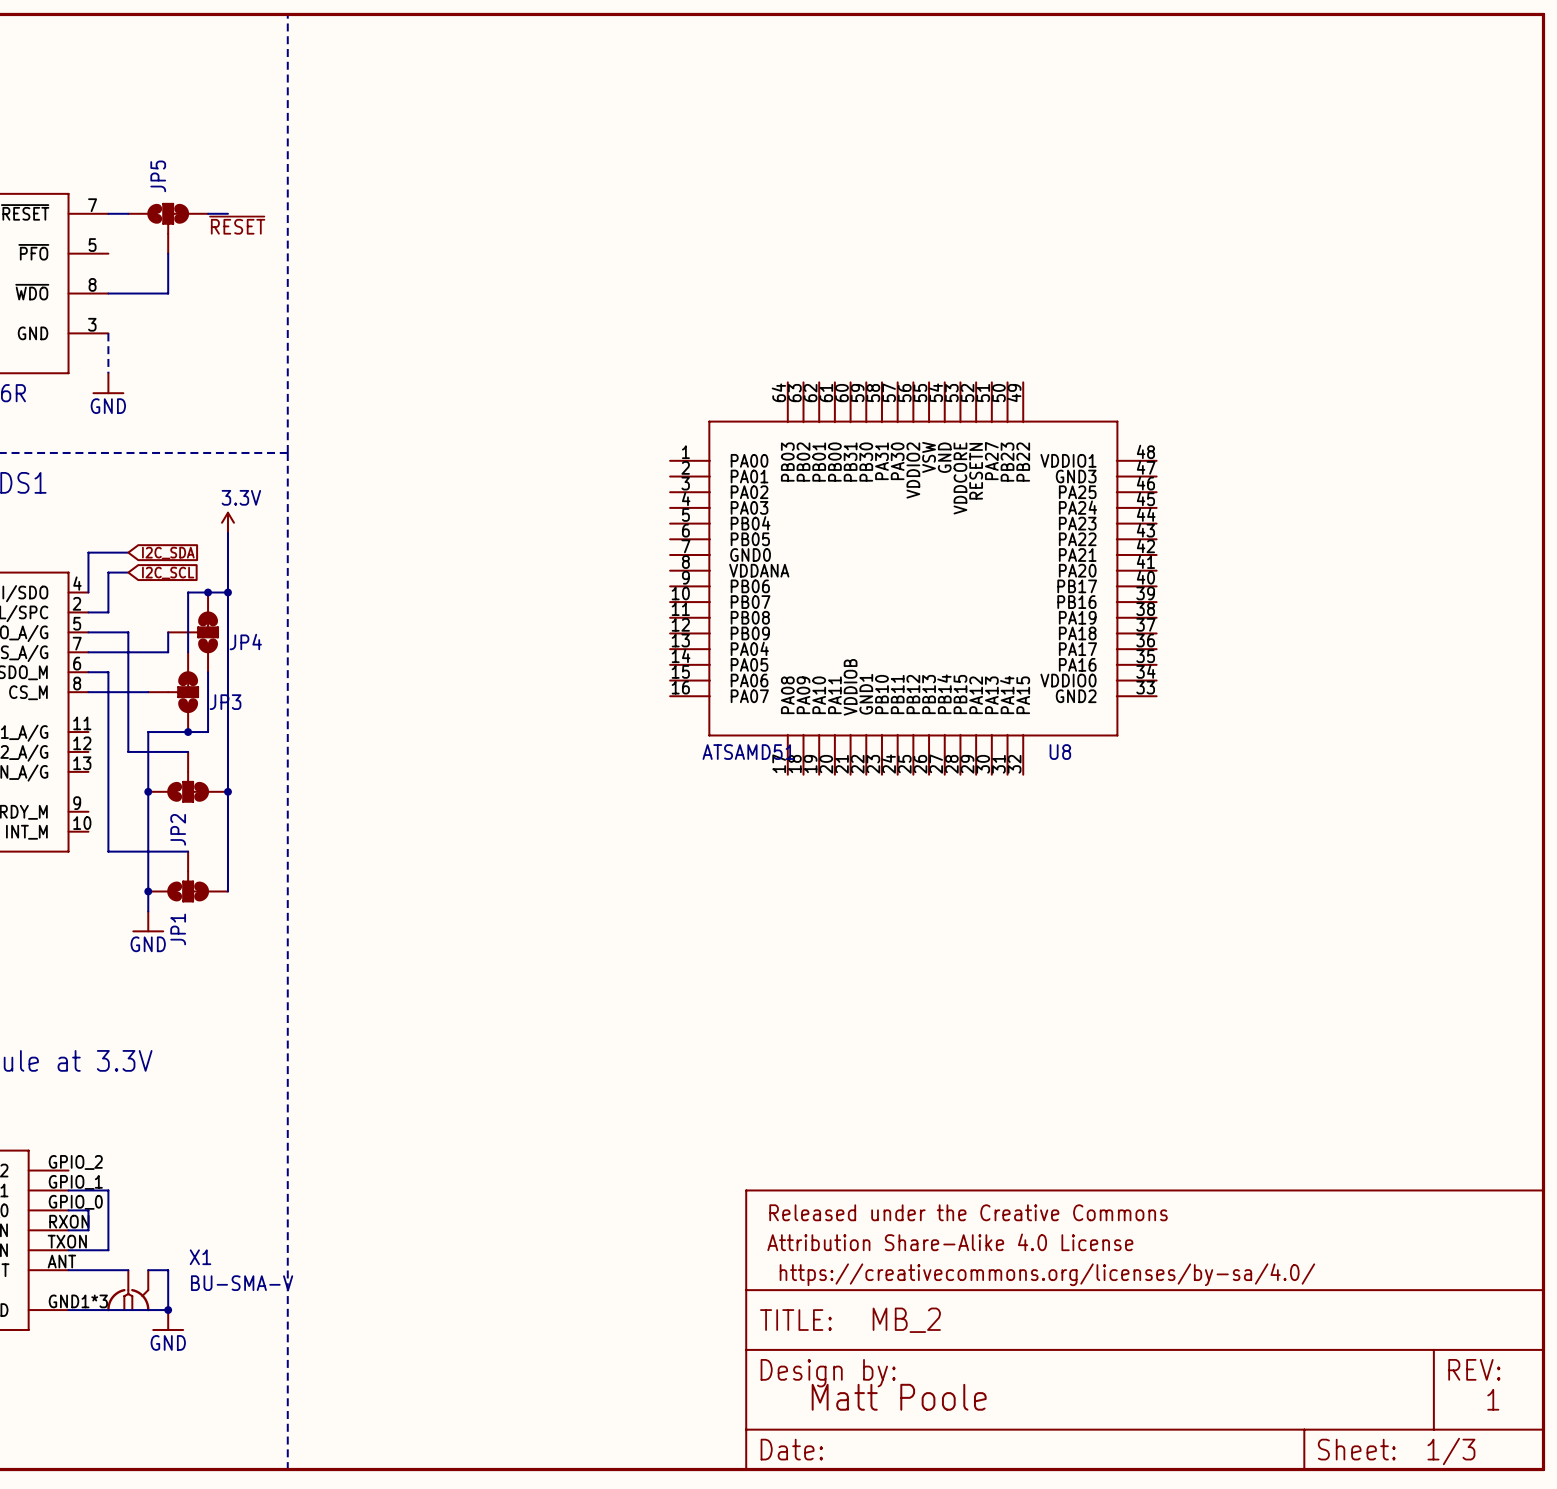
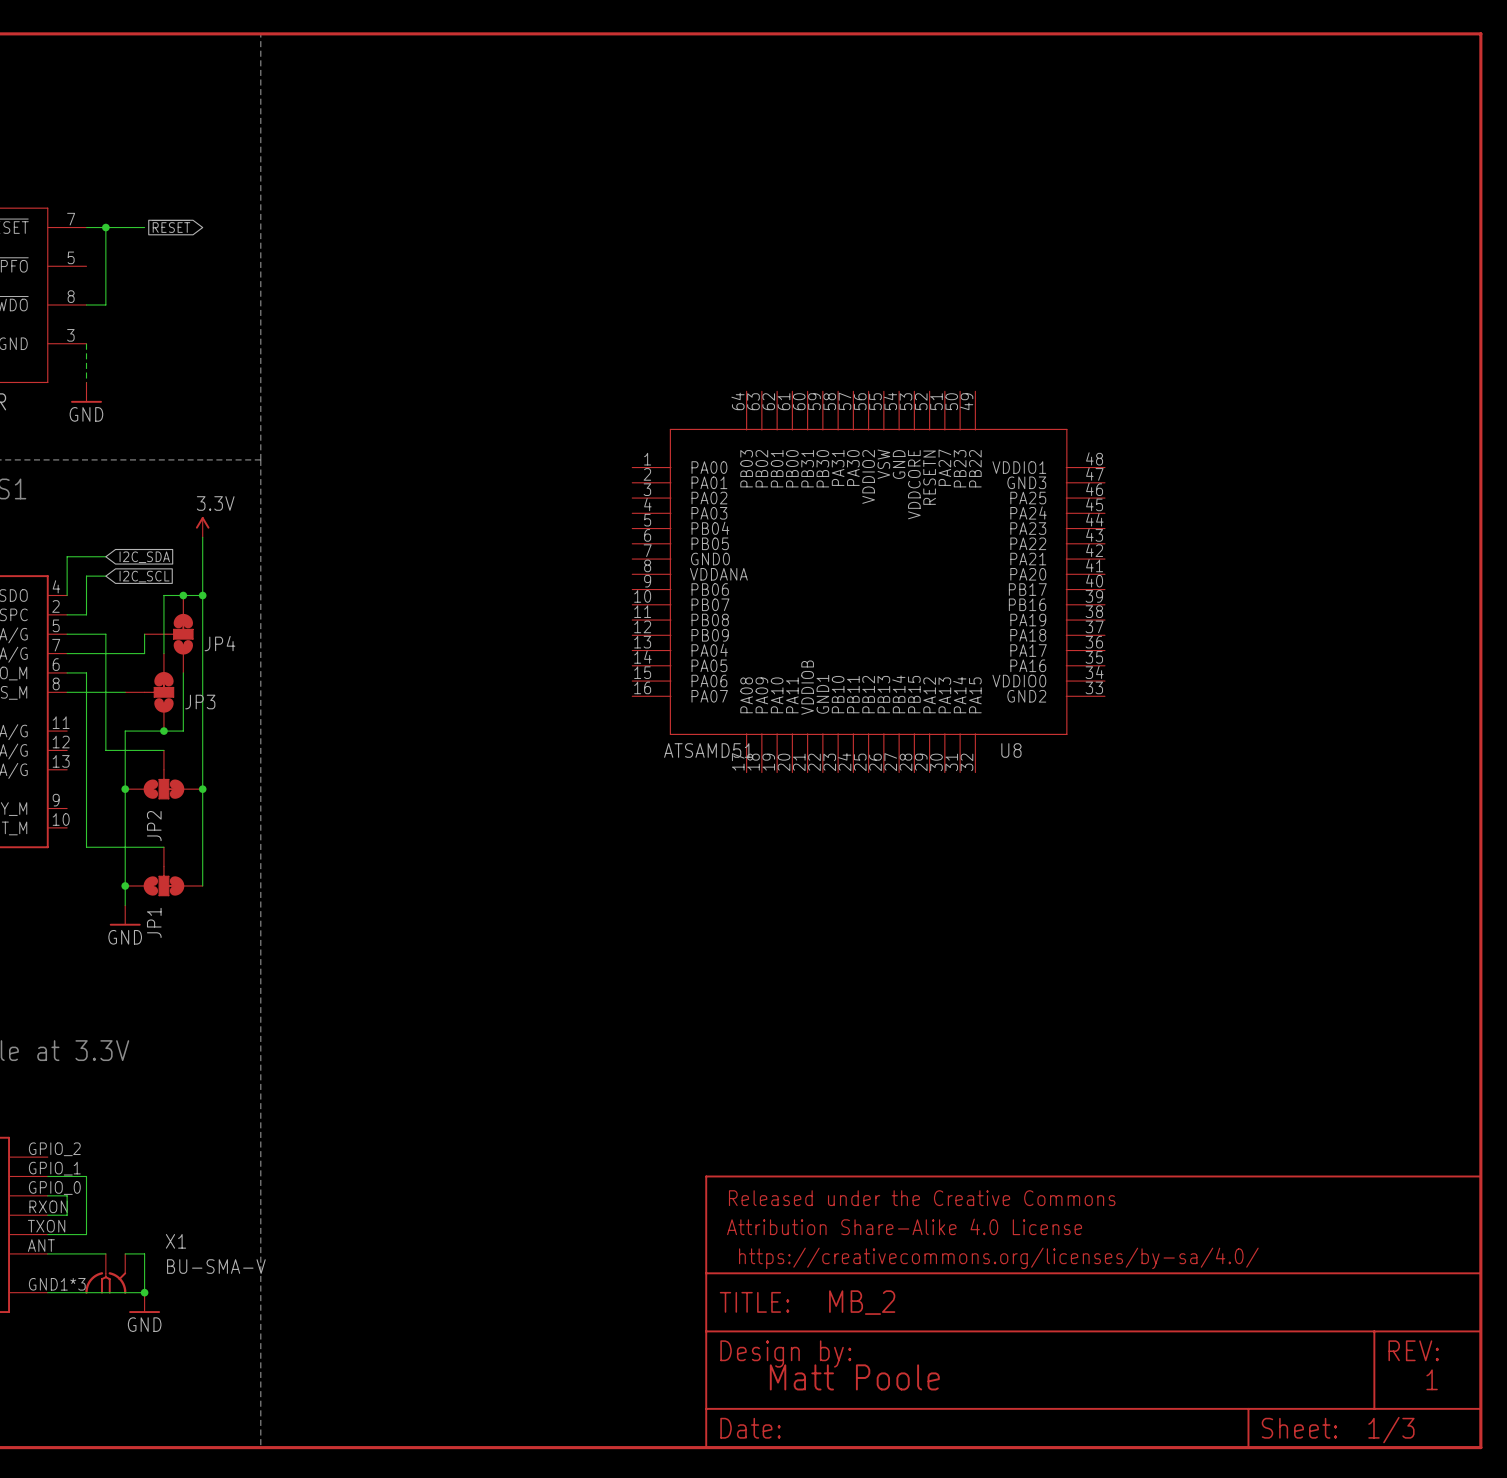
global label: none -> ~{RESET} (170, 226)
junction: none -> (105, 227)
wire: (208, 213) (227, 213) -> none
label: ~{RESET} (237, 225) -> none
JP5: (168, 228) -> none
wire: (168, 253) (168, 293) (128, 293) -> (144, 227) (105, 227) (105, 305)

